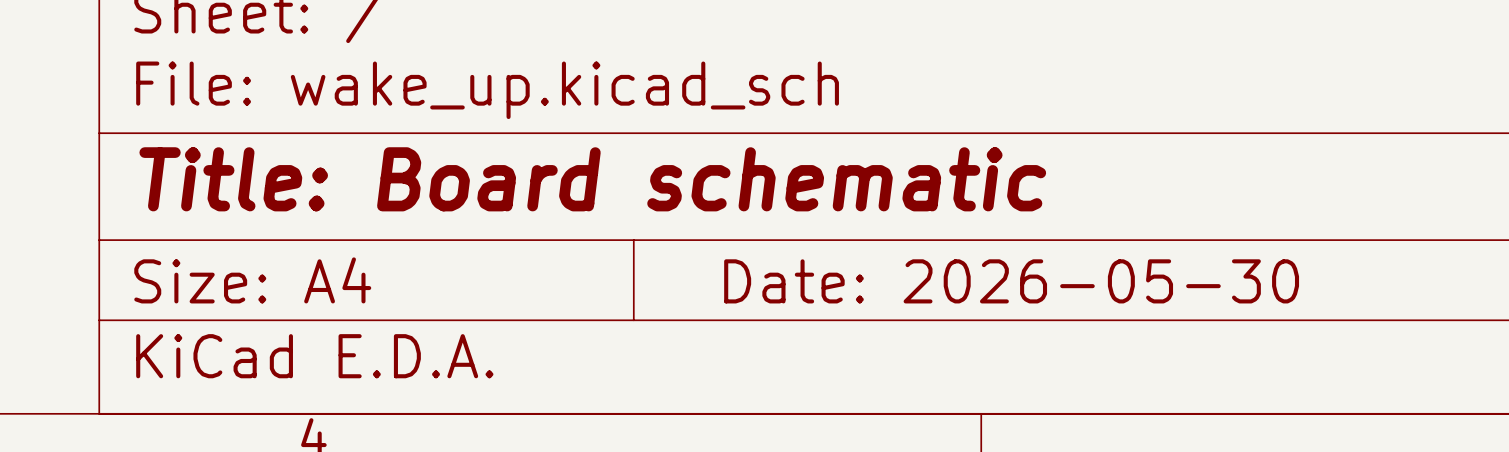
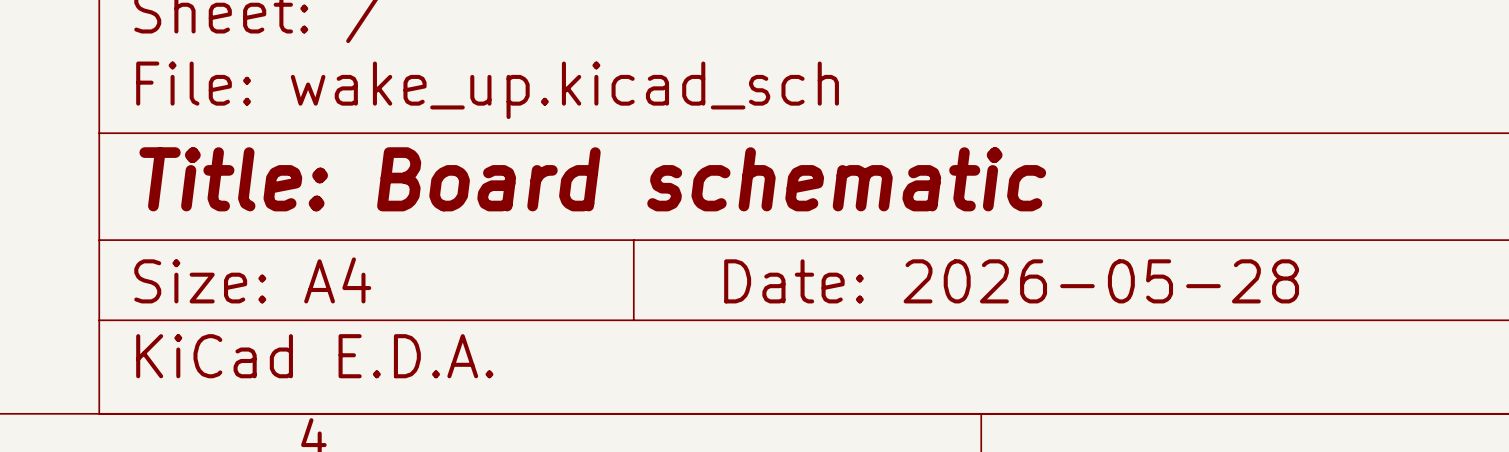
title block: Date: 2026-05-30 (1011, 281) -> Date: 2026-05-28 (1011, 281)

